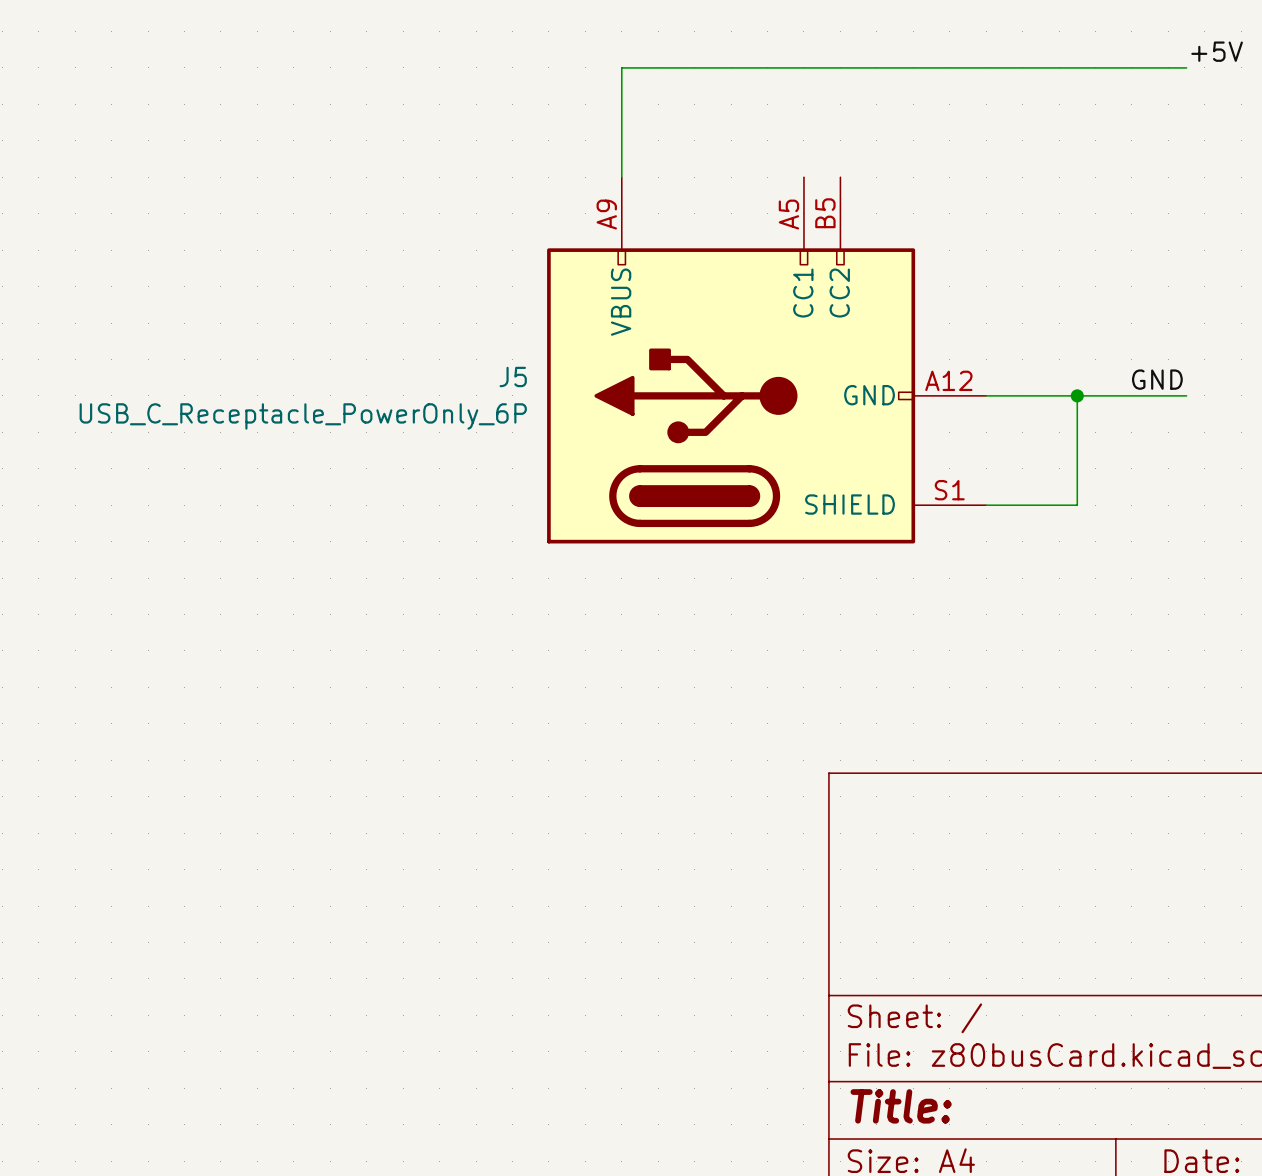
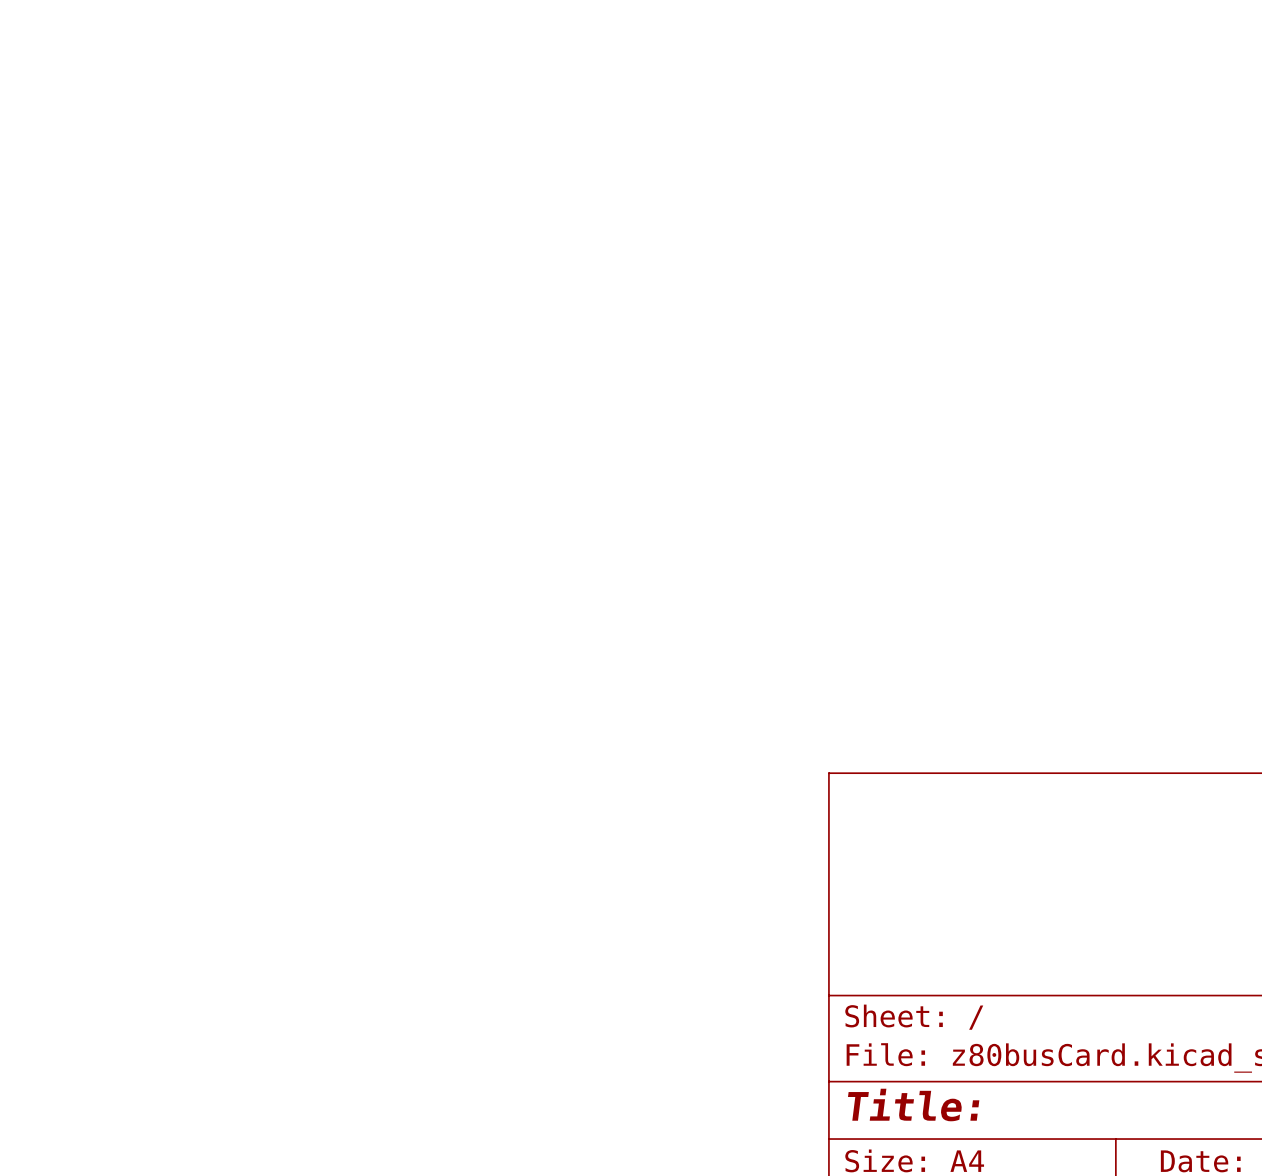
label: +5V (1217, 51) -> none
wire: (1186, 67) (621, 67) (621, 177) -> none
J5: USB_C_Receptacle_PowerOnly_6P (766, 360) -> none
label: GND (1157, 379) -> none
wire: (986, 395) (1186, 395) -> none
wire: (1077, 395) (1077, 505) (986, 505) -> none
junction: (1077, 395) -> none

